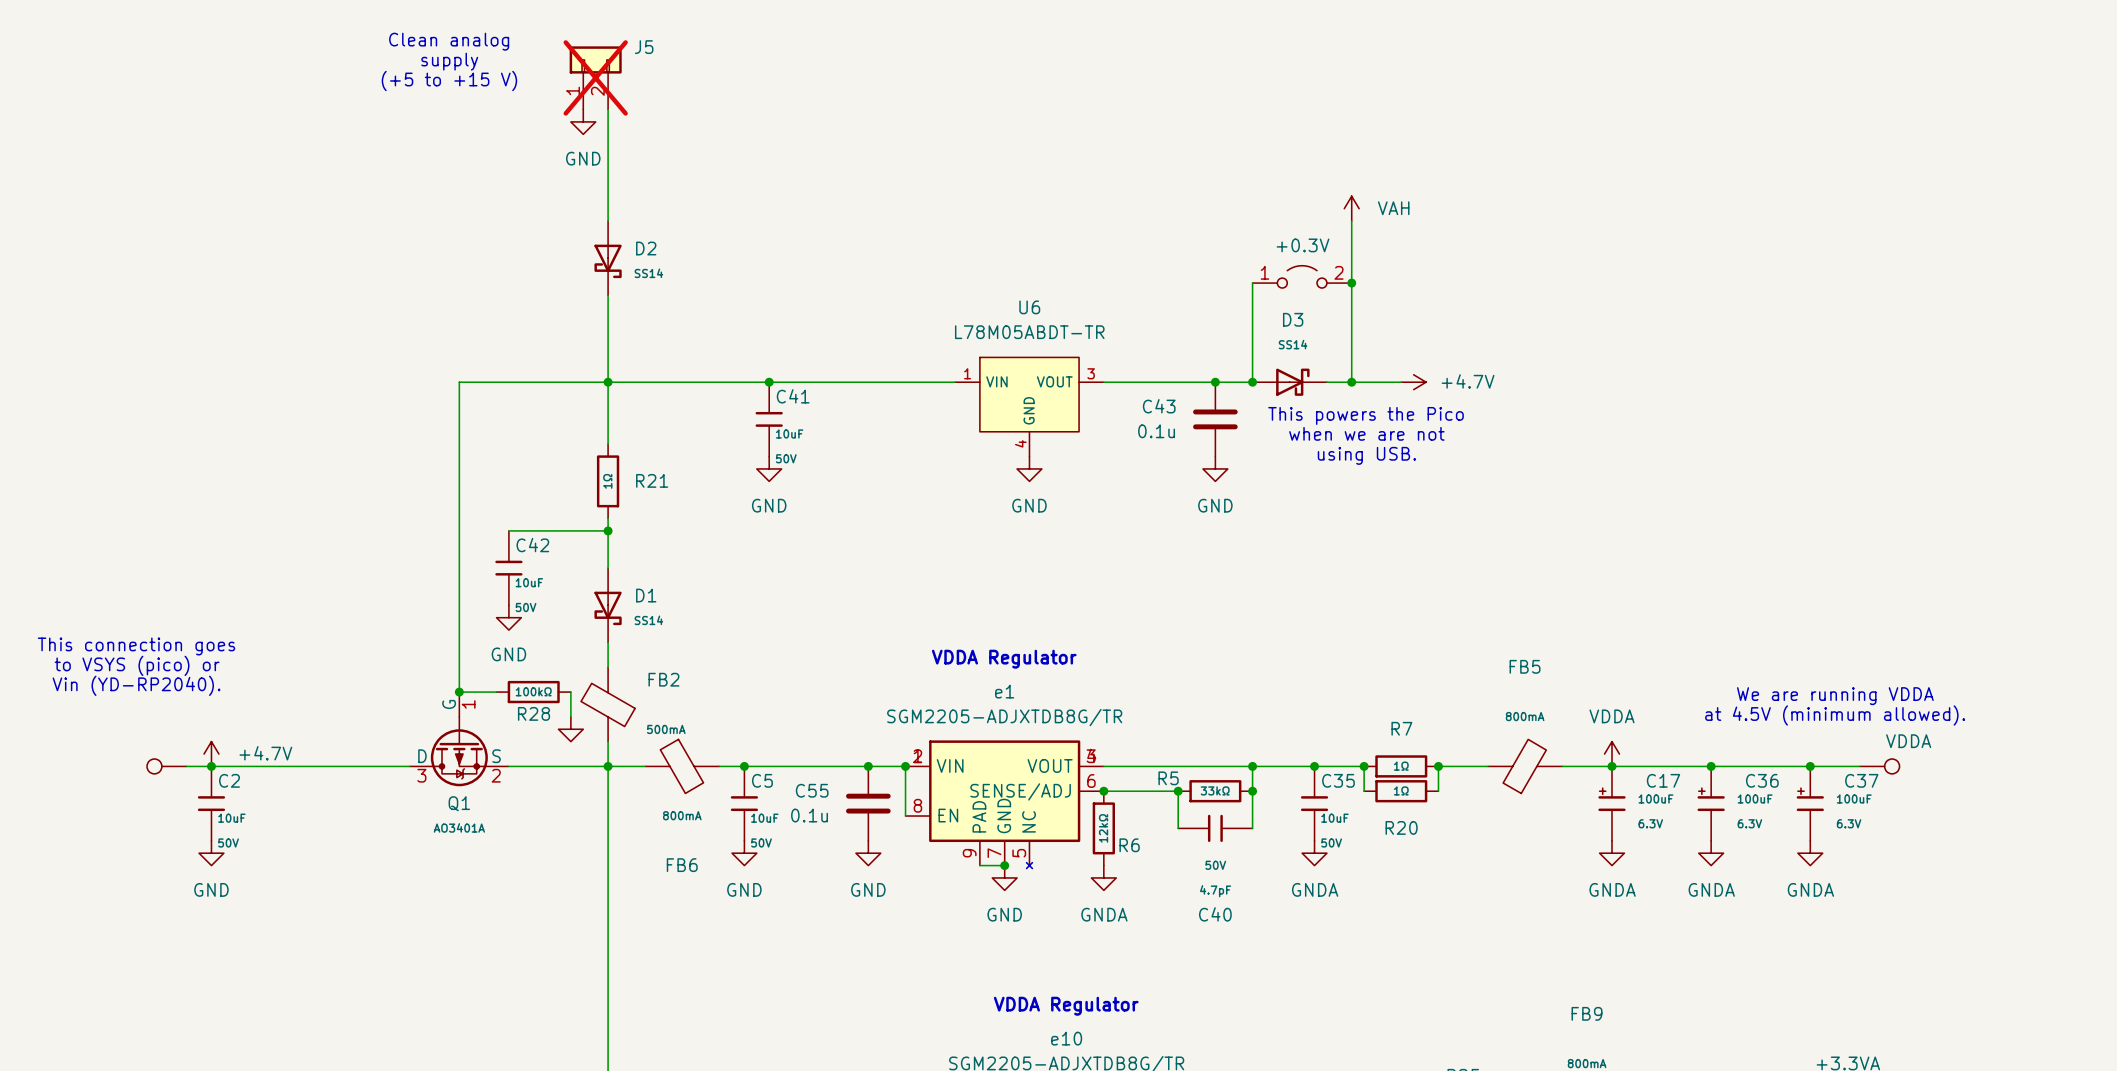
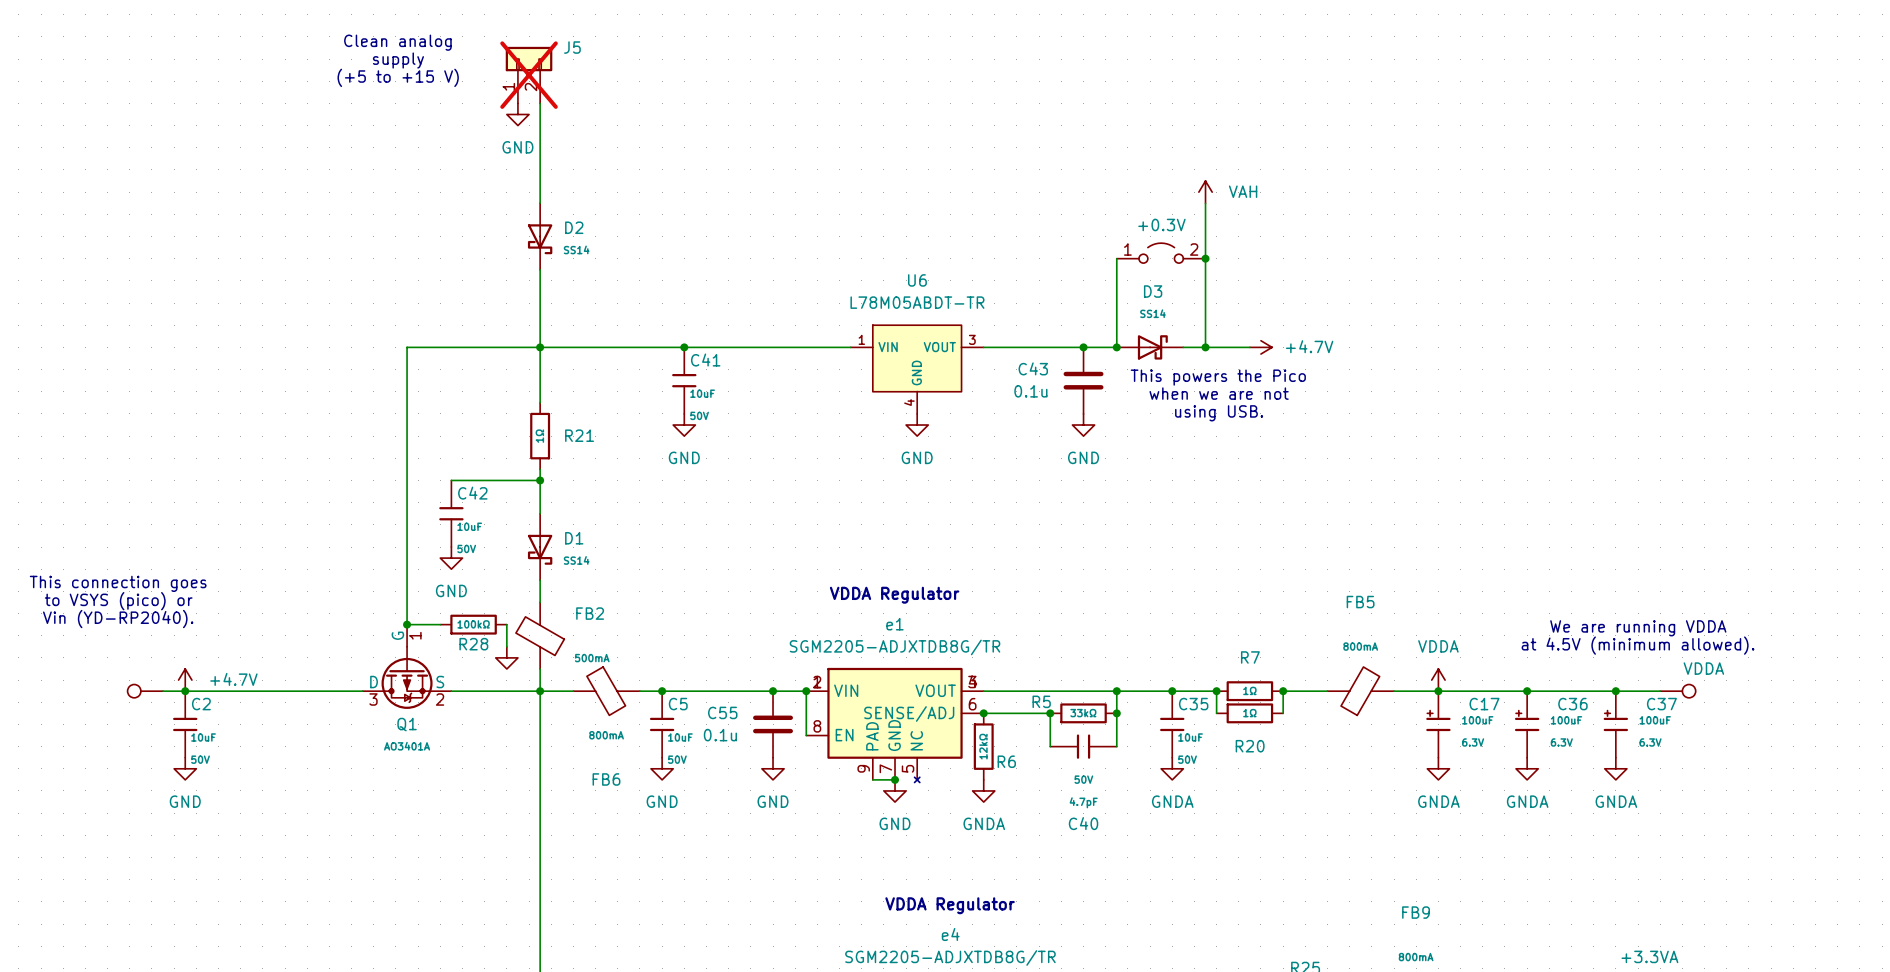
e10 name: e10 (1066, 1038) -> e4 (950, 934)

